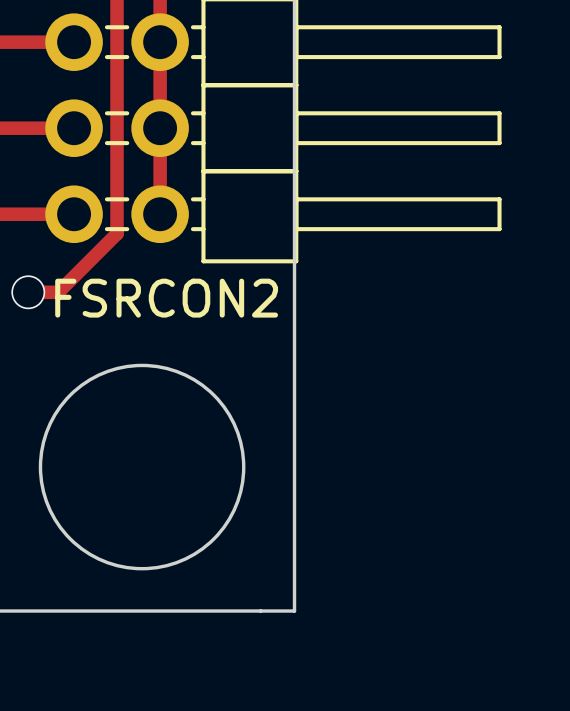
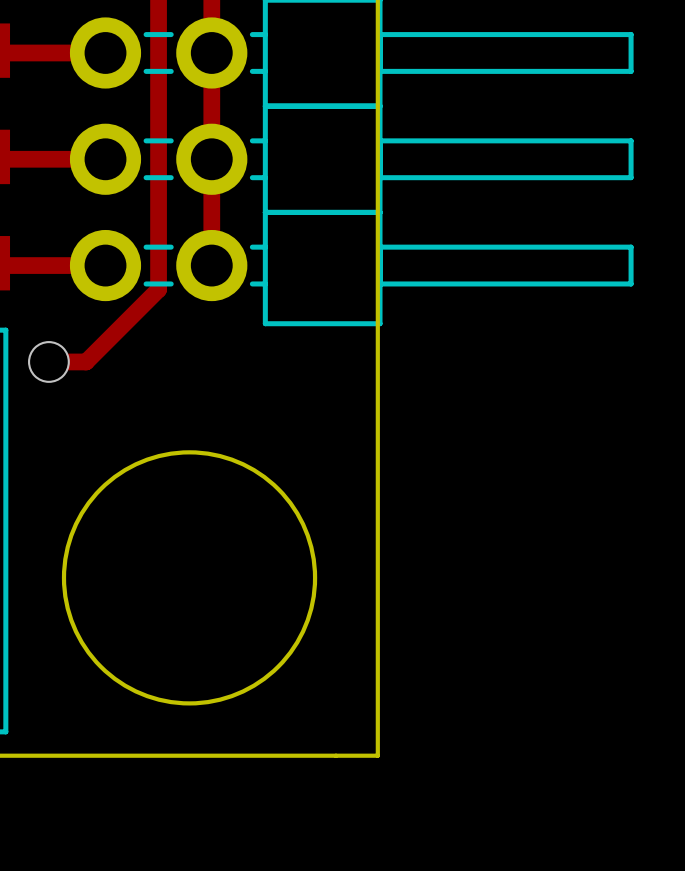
part value: FSRCON2 (166, 298) -> none

